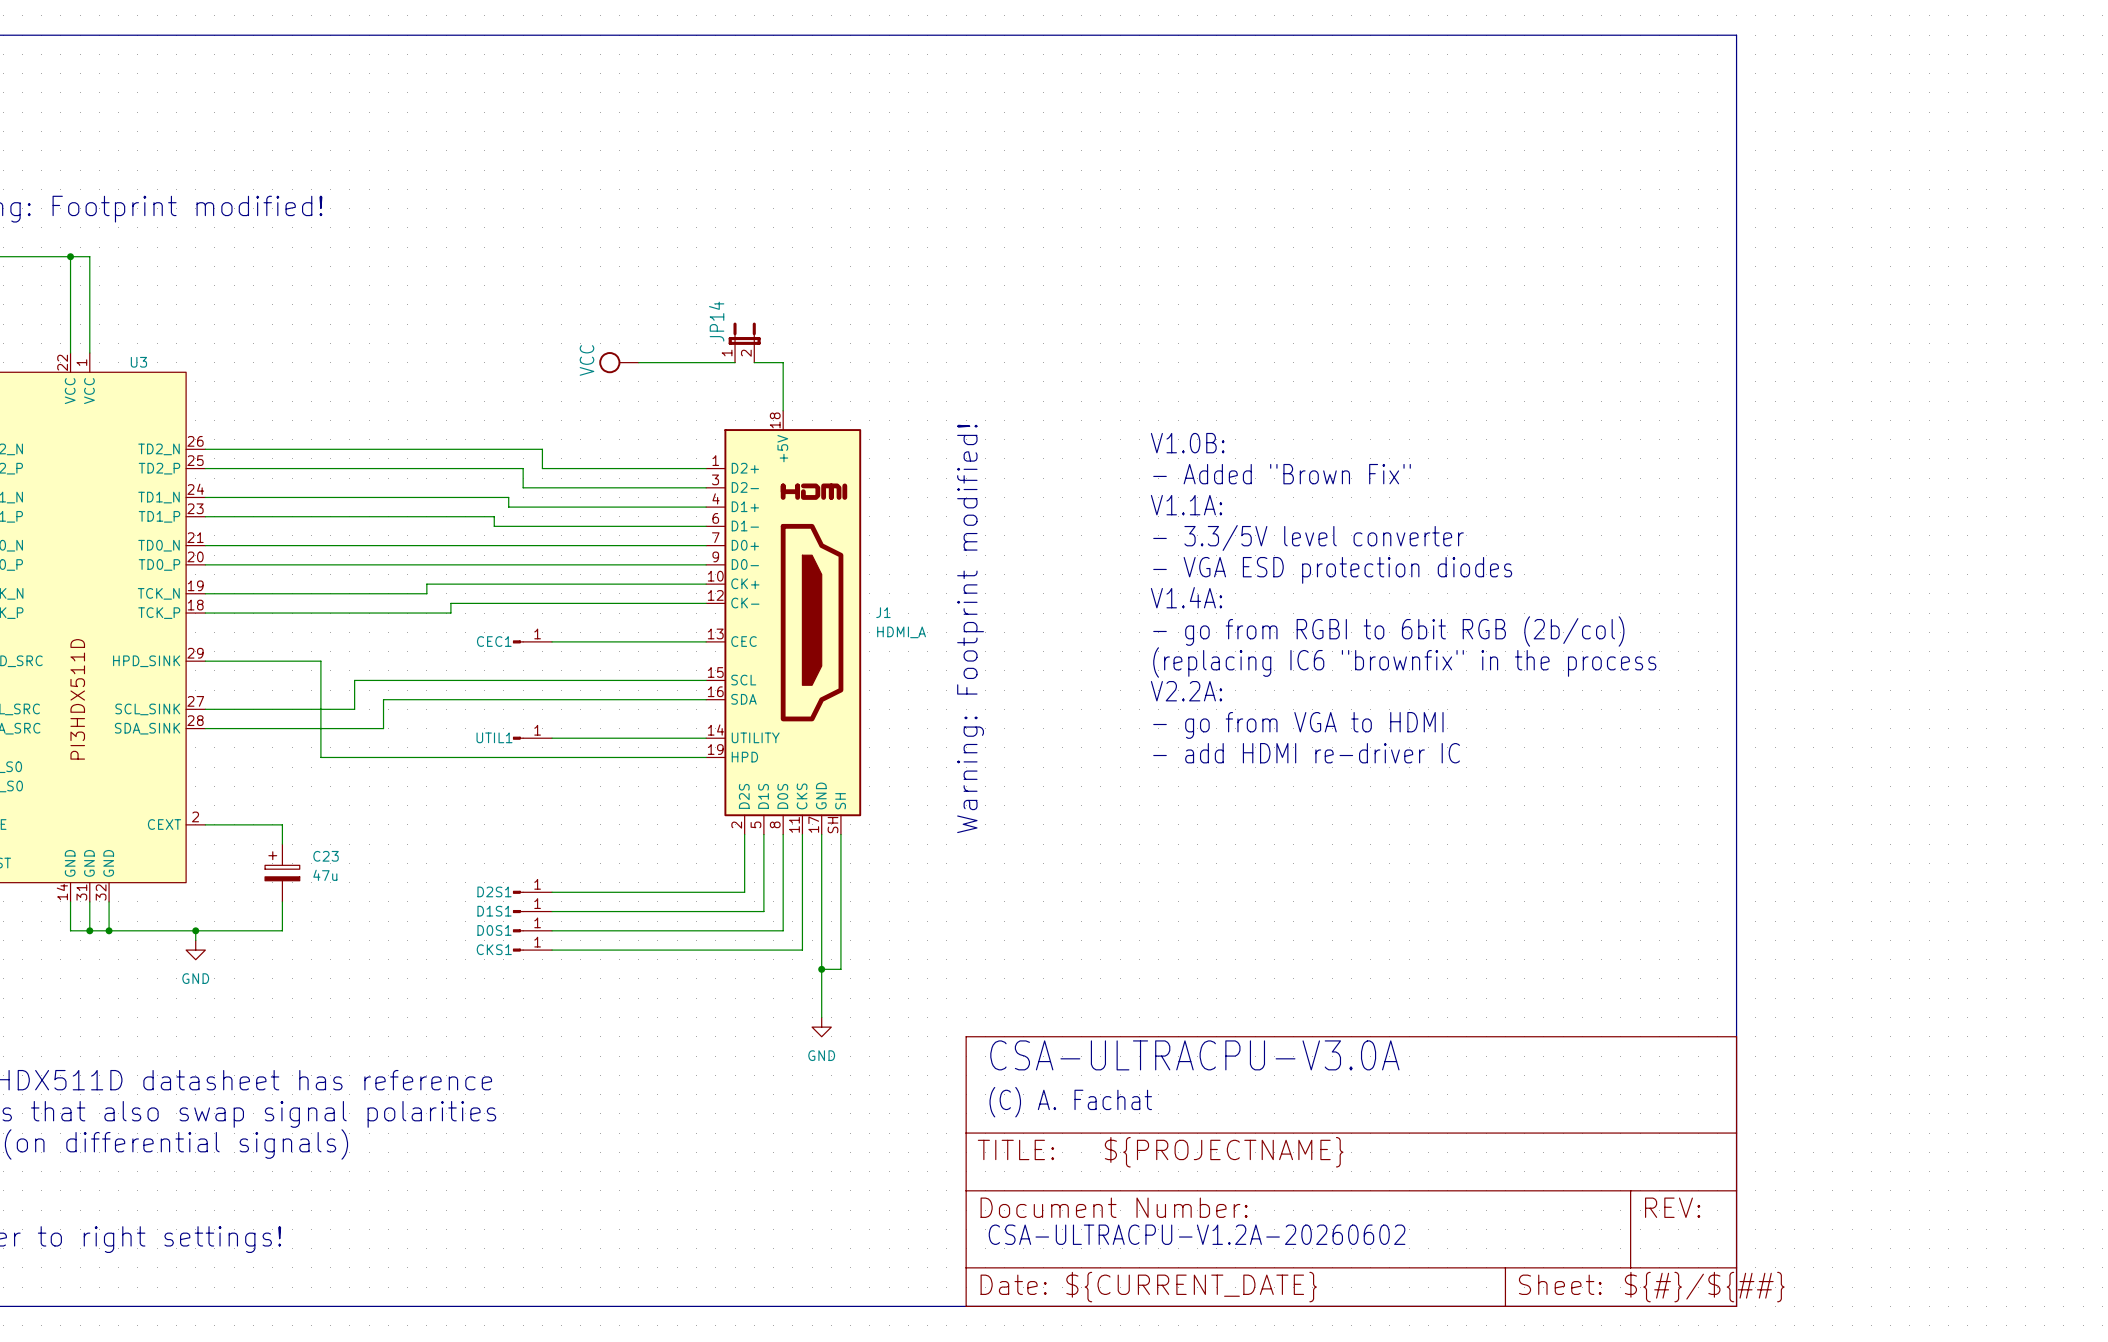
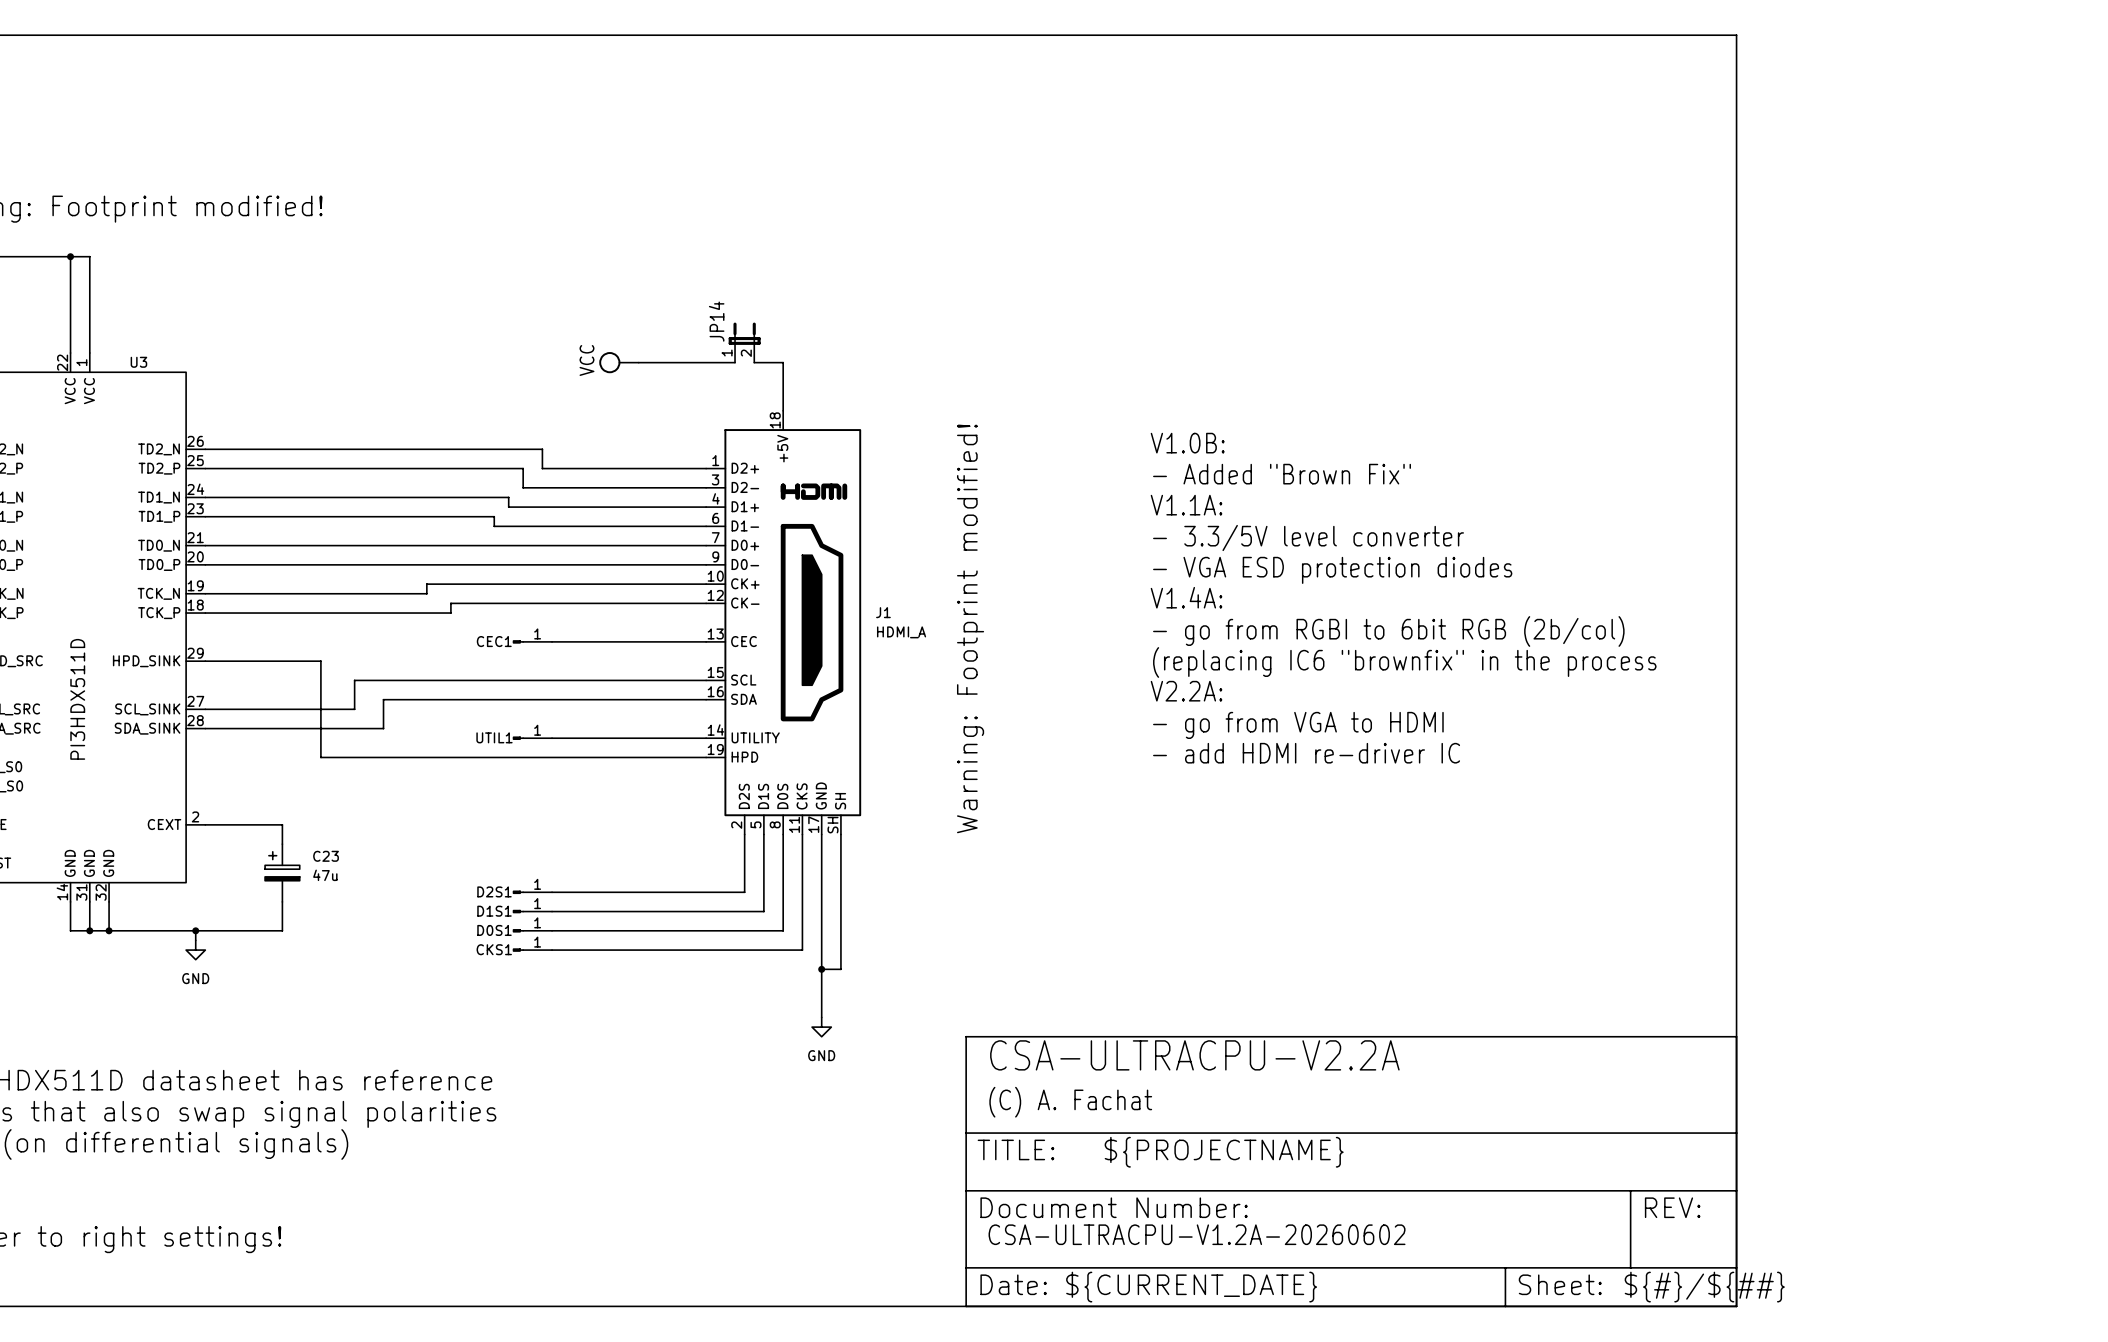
text: CSA-ULTRACPU-V3.0A (1194, 1055) -> CSA-ULTRACPU-V2.2A (1194, 1055)

